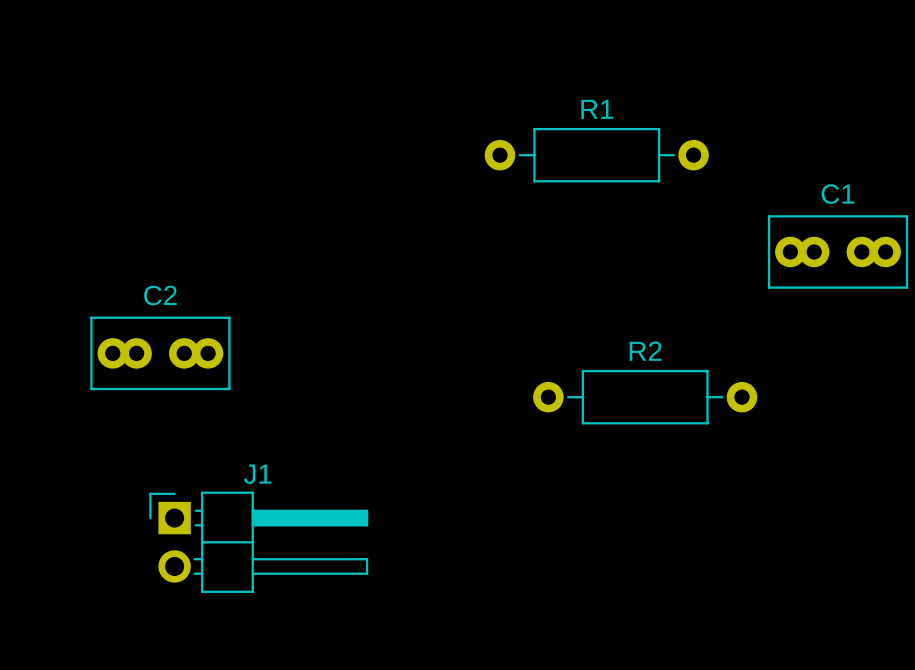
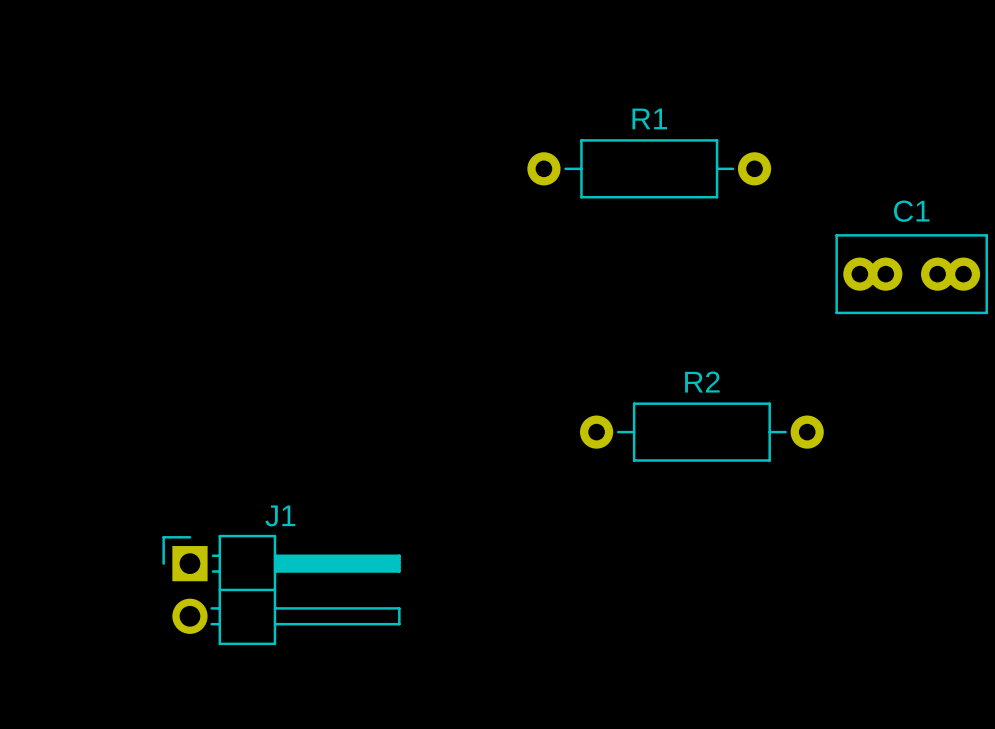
C2: (160, 353) -> none

